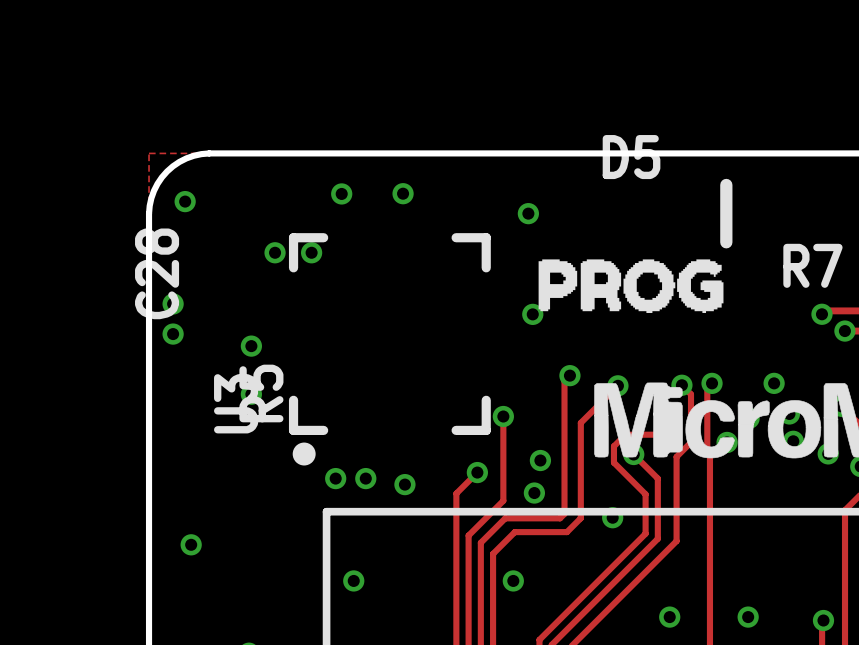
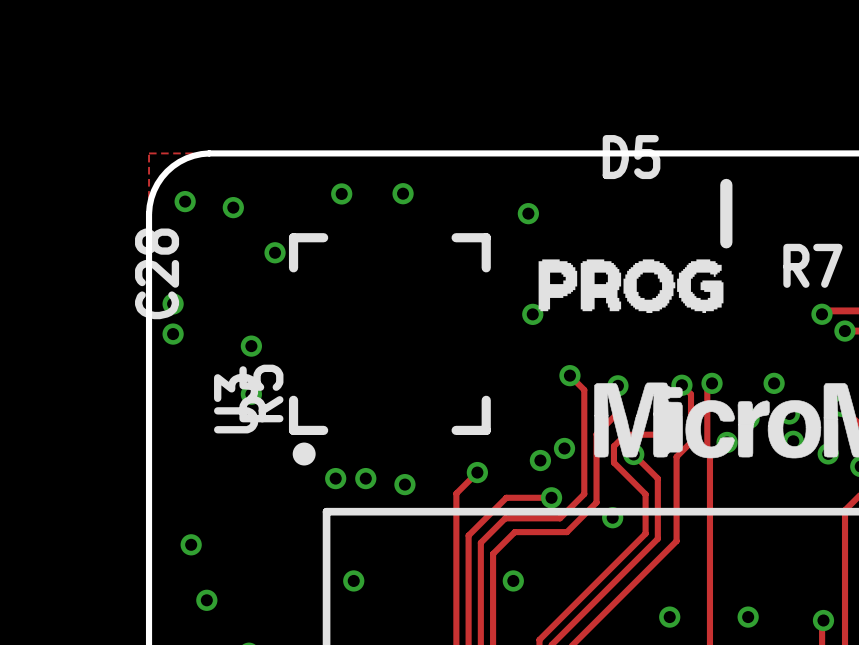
via position: (311, 252) -> (233, 207)
track: (569, 375) (564, 381) (564, 513) -> (569, 375) (584, 389) (584, 494) (564, 513)
track: (617, 385) (580, 422) (580, 518) -> (617, 412) (596, 434) (596, 502) (580, 518)
track: (503, 416) (503, 500) -> (551, 497) (506, 497) (503, 500)
via: (503, 416) -> none
via: none -> (564, 448)
via position: (534, 493) -> (551, 497)
via: none -> (206, 600)

